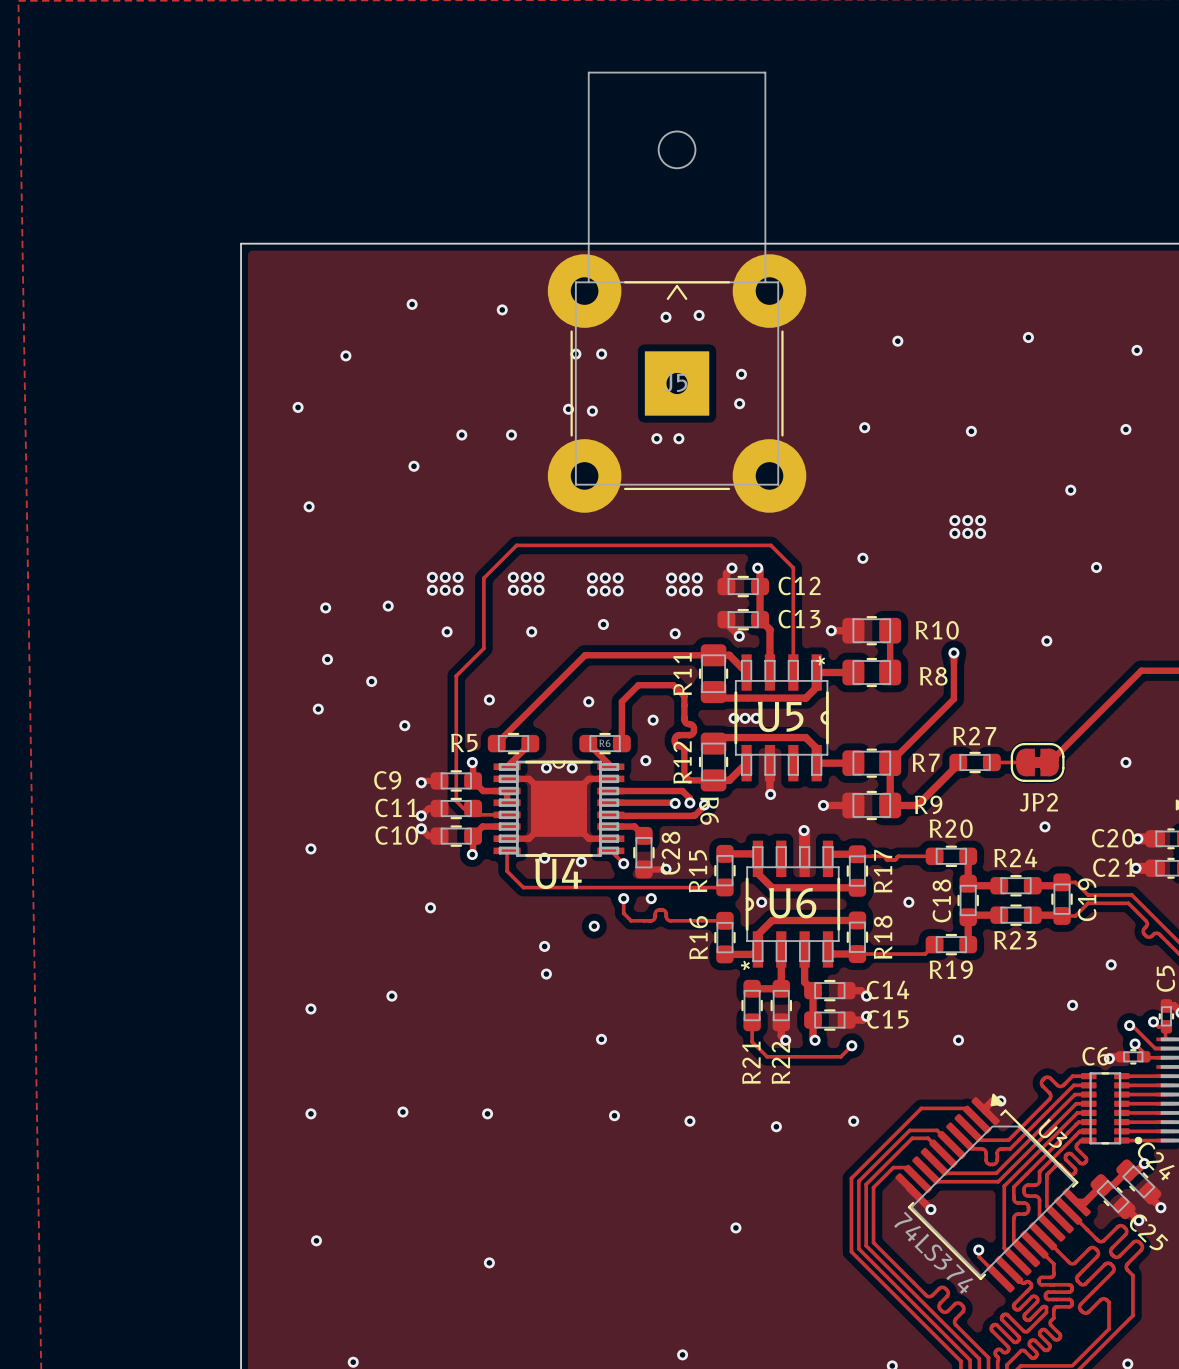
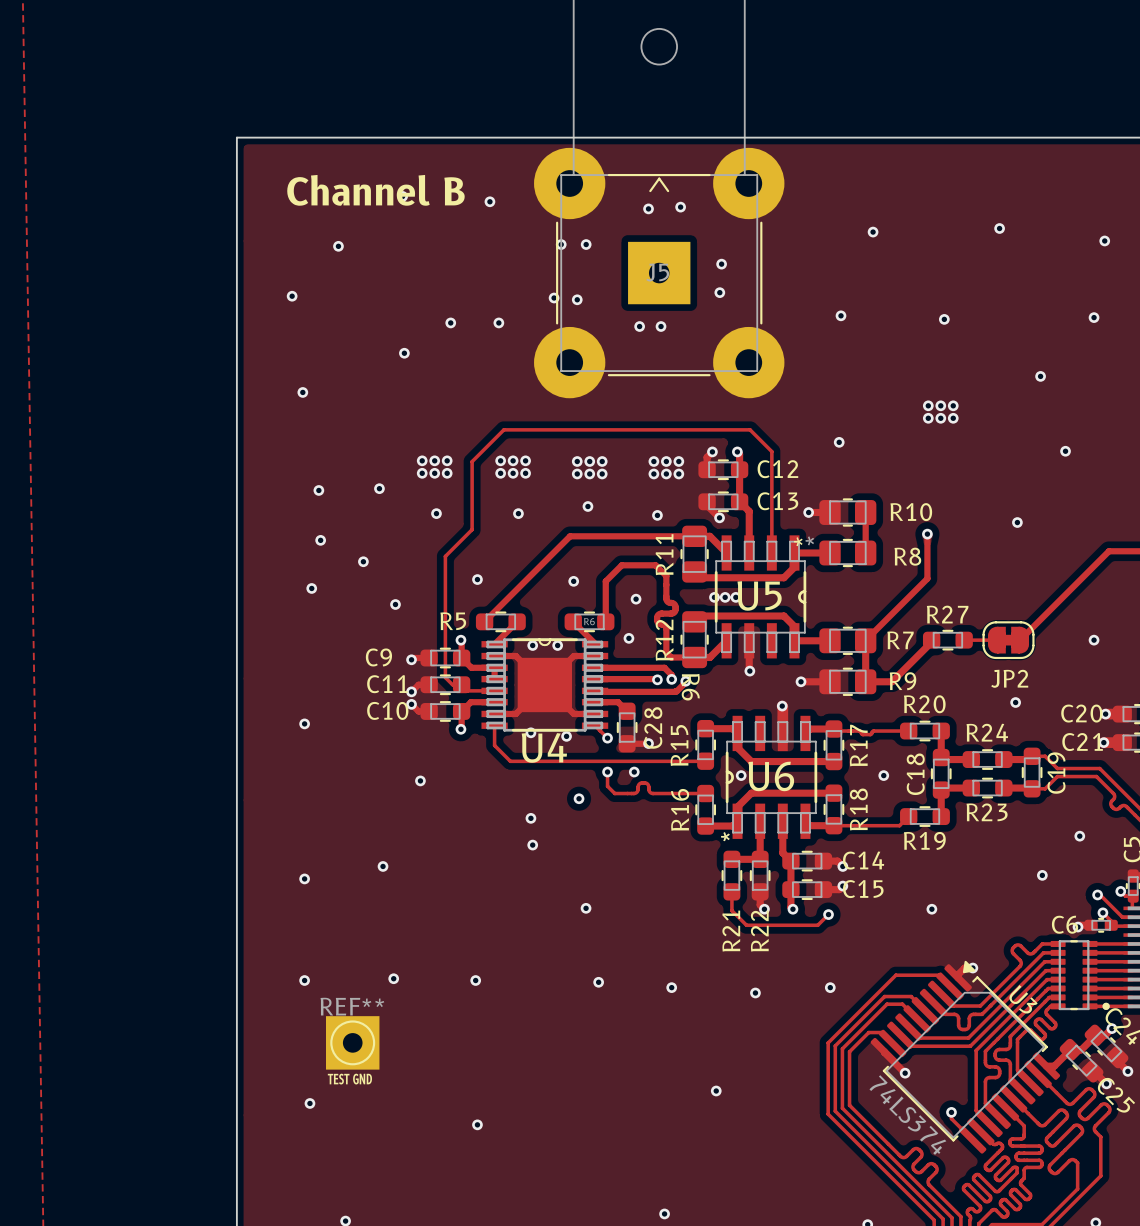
text: none -> Channel B (375, 190)
U5 footprint: [734, 654, 829, 782] -> [714, 535, 807, 659]
REF**: none -> (352, 1042)
text: none -> TEST GND (349, 1079)

